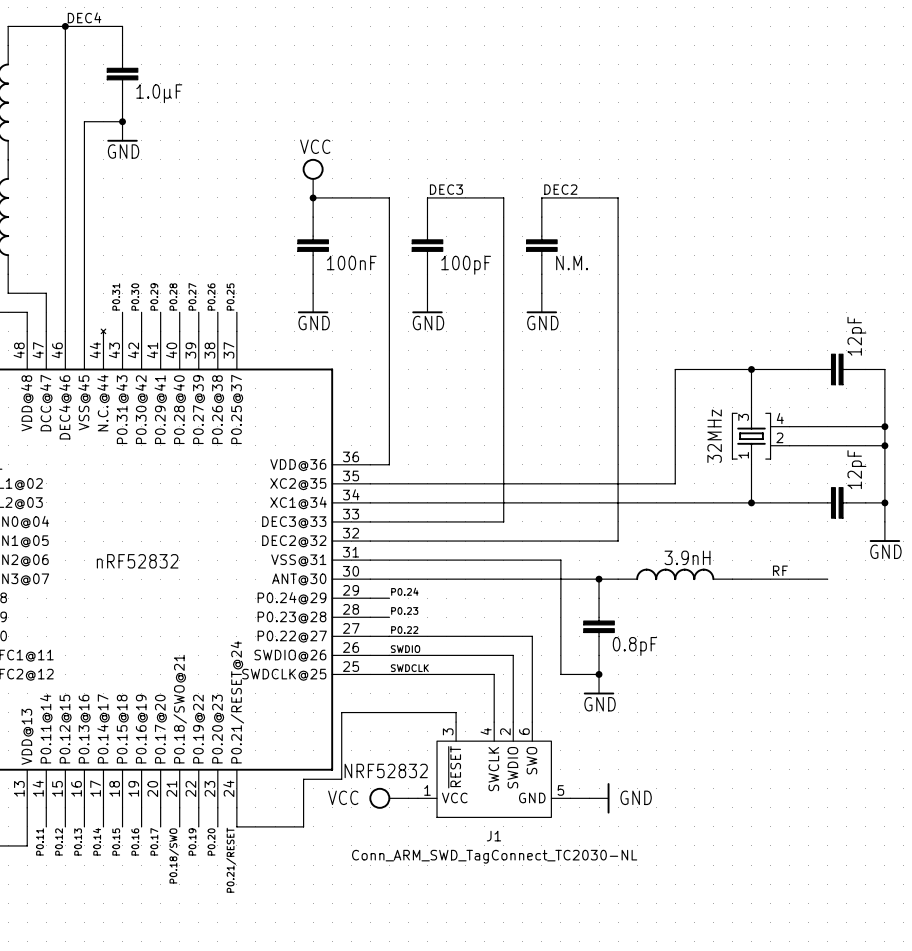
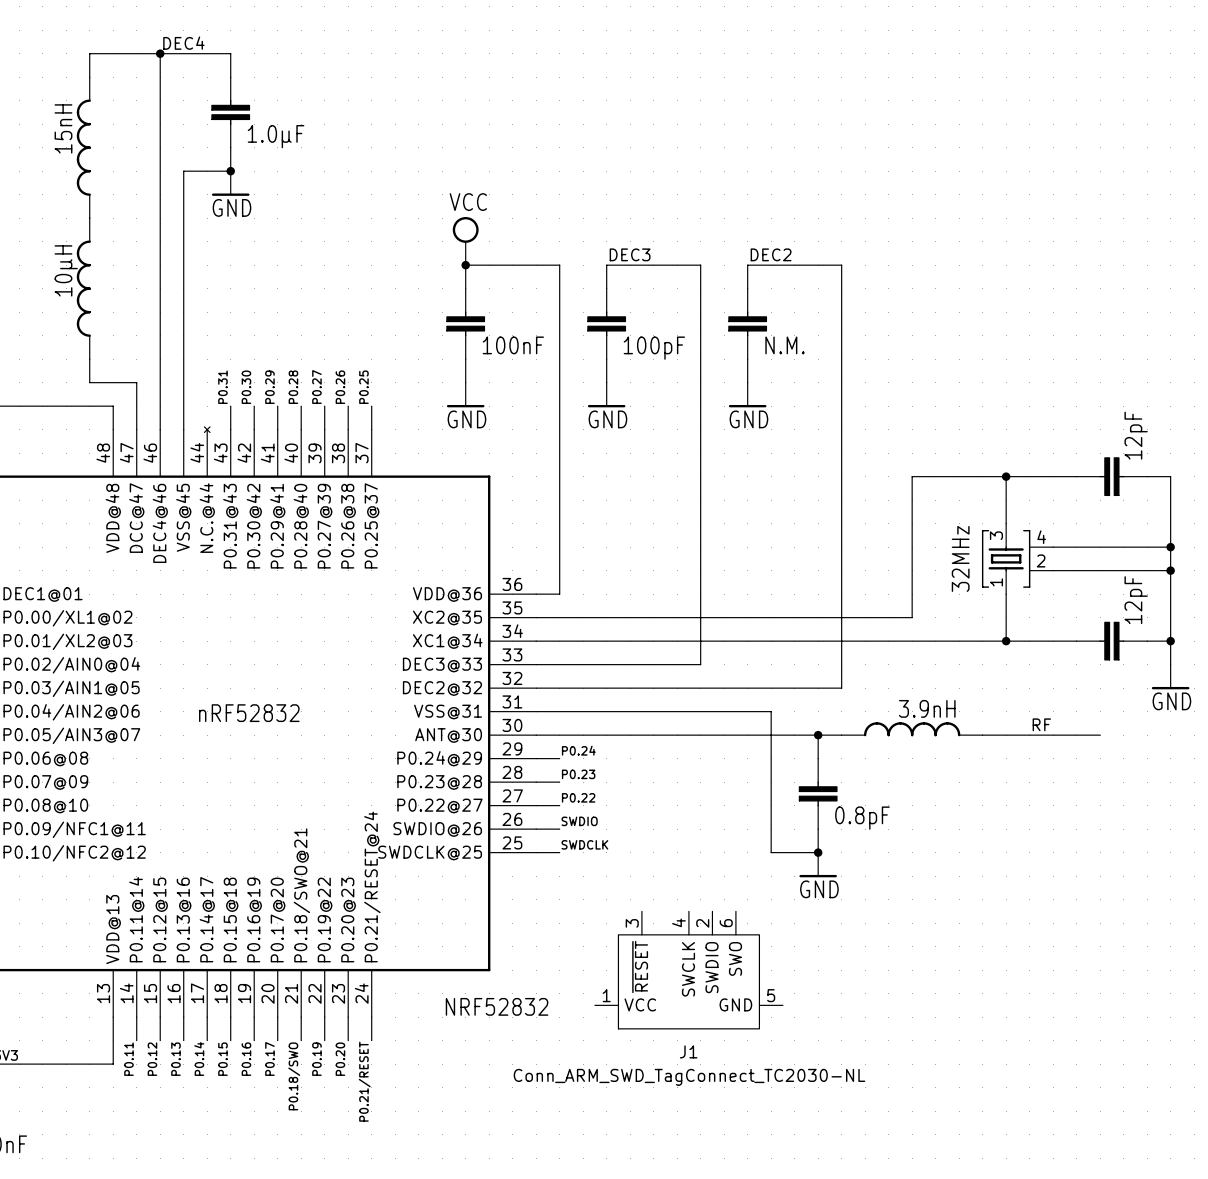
wire: (389, 636) (532, 636) (532, 722) -> none
wire: (389, 655) (513, 655) (513, 722) -> none
wire: (389, 674) (494, 674) (494, 722) -> none
wire: (456, 722) (456, 712) (341, 712) (341, 779) (303, 779) (303, 826) (236, 826) -> none
part value position: NRF52832 (386, 770) -> NRF52832 (497, 1006)
power symbol: VCC (388, 798) -> none
wire: (408, 798) (417, 798) -> none
wire: (570, 798) (589, 798) -> none
power symbol: GND (599, 798) -> none

